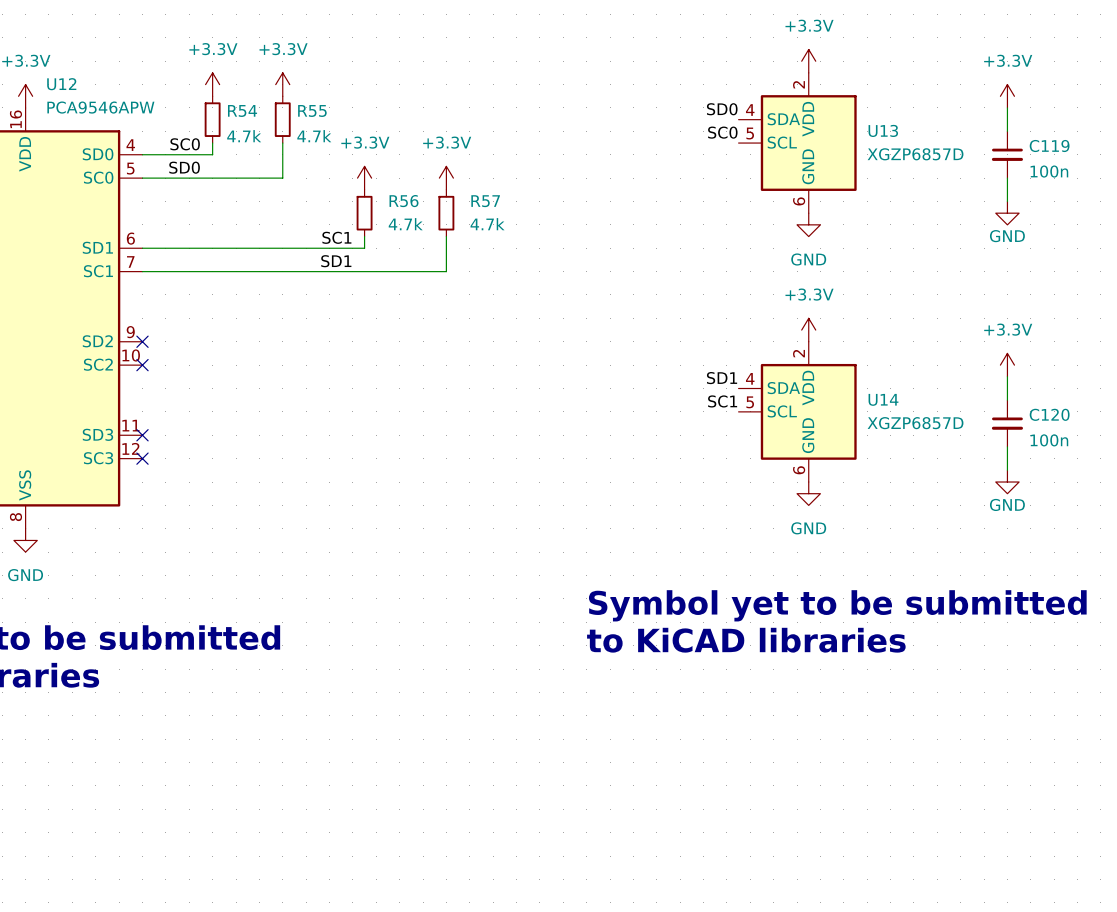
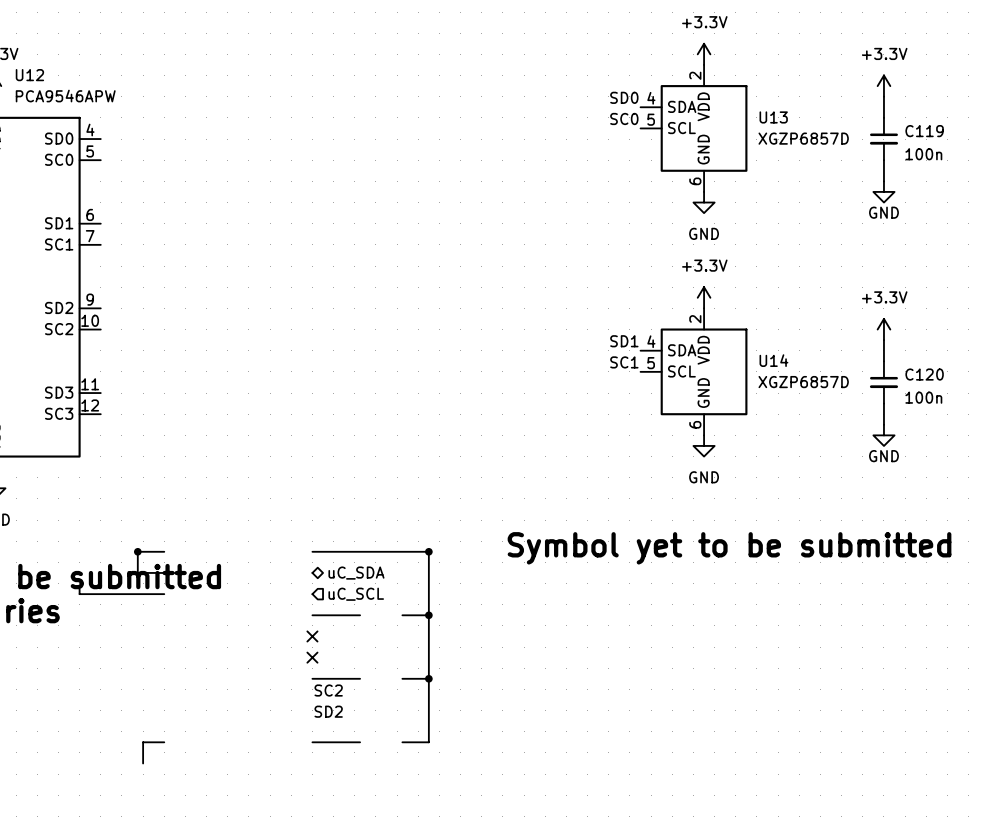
power symbol: +3.3V (212, 84) -> none
power symbol: +3.3V (282, 84) -> none
R54: 4.7k (212, 119) -> none
R55: 4.7k (282, 119) -> none
wire: (212, 143) (212, 154) (142, 154) -> none
wire: (282, 143) (282, 178) (142, 178) -> none
label: SC0 (185, 144) -> none
label: SD0 (184, 167) -> none
power symbol: +3.3V (364, 178) -> none
power symbol: +3.3V (446, 178) -> none
R56: 4.7k (364, 213) -> none
R57: 4.7k (446, 213) -> none
wire: (364, 236) (364, 248) (142, 248) -> none
wire: (446, 236) (446, 271) (142, 271) -> none
label: SC1 (336, 237) -> none
label: SD1 (336, 261) -> none
no-connect mark: (142, 341) -> none
no-connect mark: (142, 365) -> none
no-connect mark: (142, 435) -> none
no-connect mark: (142, 458) -> none
junction: none -> (137, 551)
wire: none -> (164, 551) (137, 551) (137, 572) (164, 572)
wire: none -> (312, 551) (428, 551) (428, 742) (402, 742)
junction: none -> (428, 551)
hierarchical label: none -> uC_SDA (356, 573)
text: to KiCAD libraries (746, 640) -> none
wire: none -> (79, 588) (79, 594) (164, 594)
hierarchical label: none -> uC_SCL (356, 594)
wire: none -> (312, 615) (360, 615)
wire: none -> (402, 615) (428, 615)
junction: none -> (428, 615)
no-connect mark: none -> (312, 636)
no-connect mark: none -> (312, 657)
wire: none -> (312, 678) (360, 678)
wire: none -> (402, 678) (428, 678)
junction: none -> (428, 678)
label: none -> SC2 (328, 690)
label: none -> SD2 (328, 711)
wire: none -> (164, 742) (143, 742) (143, 763)
wire: none -> (312, 742) (360, 742)

